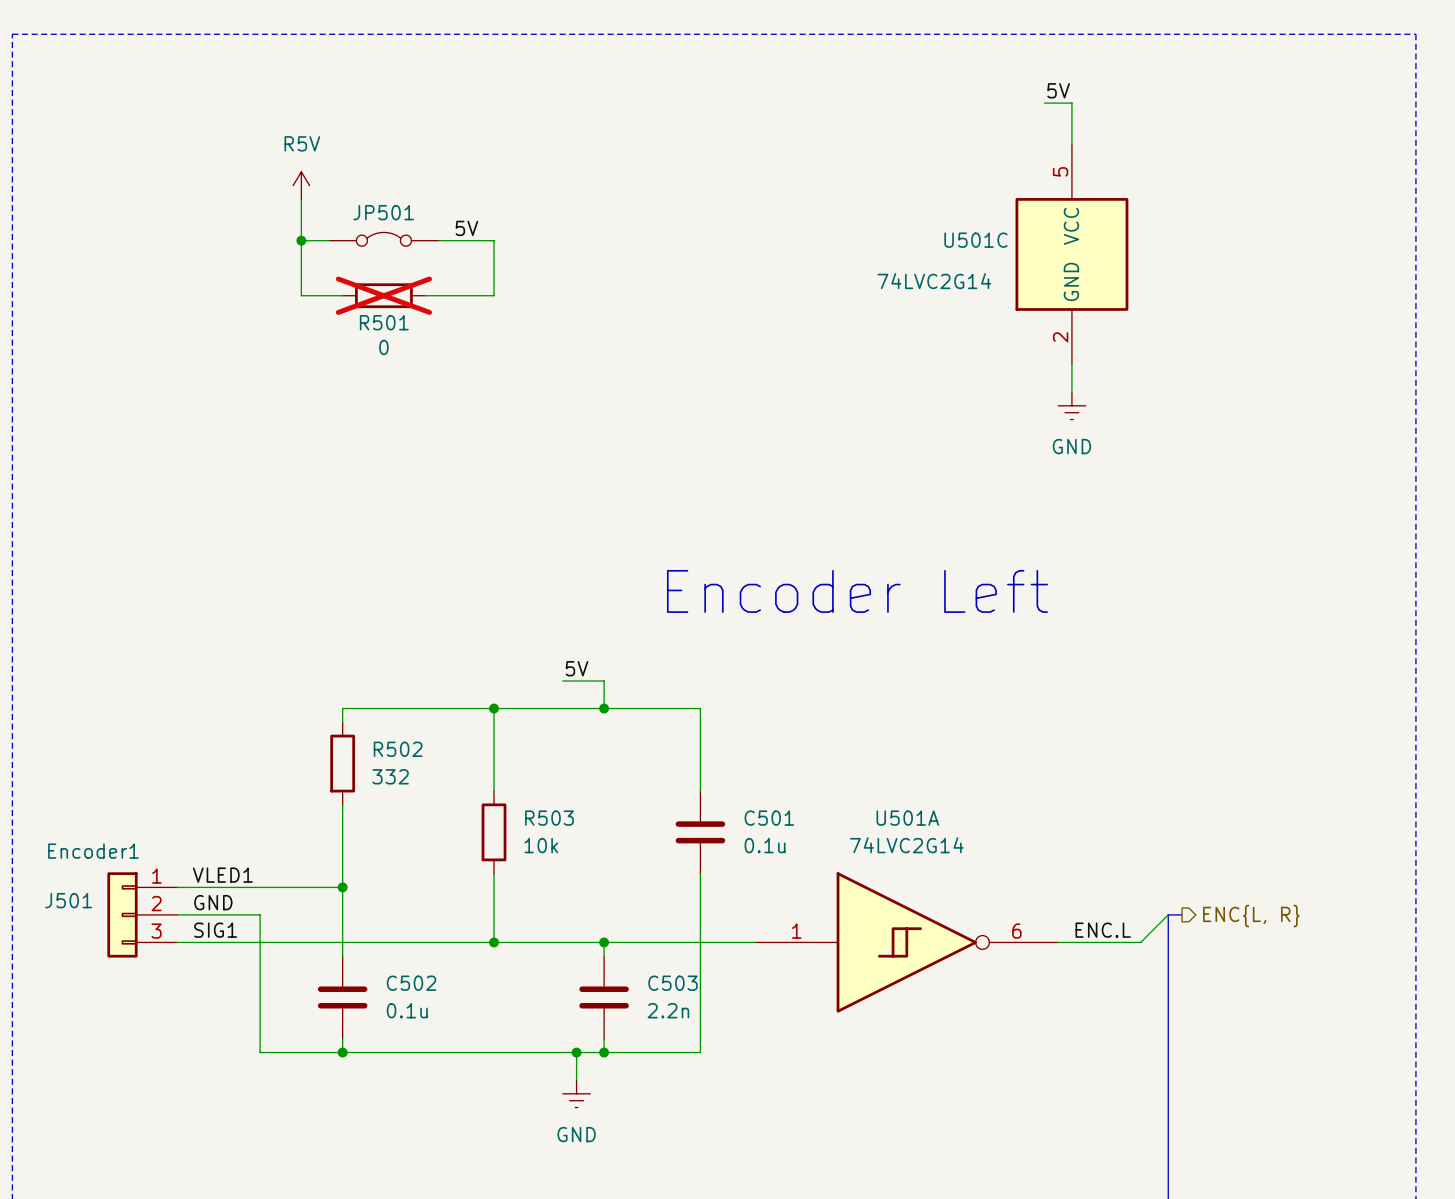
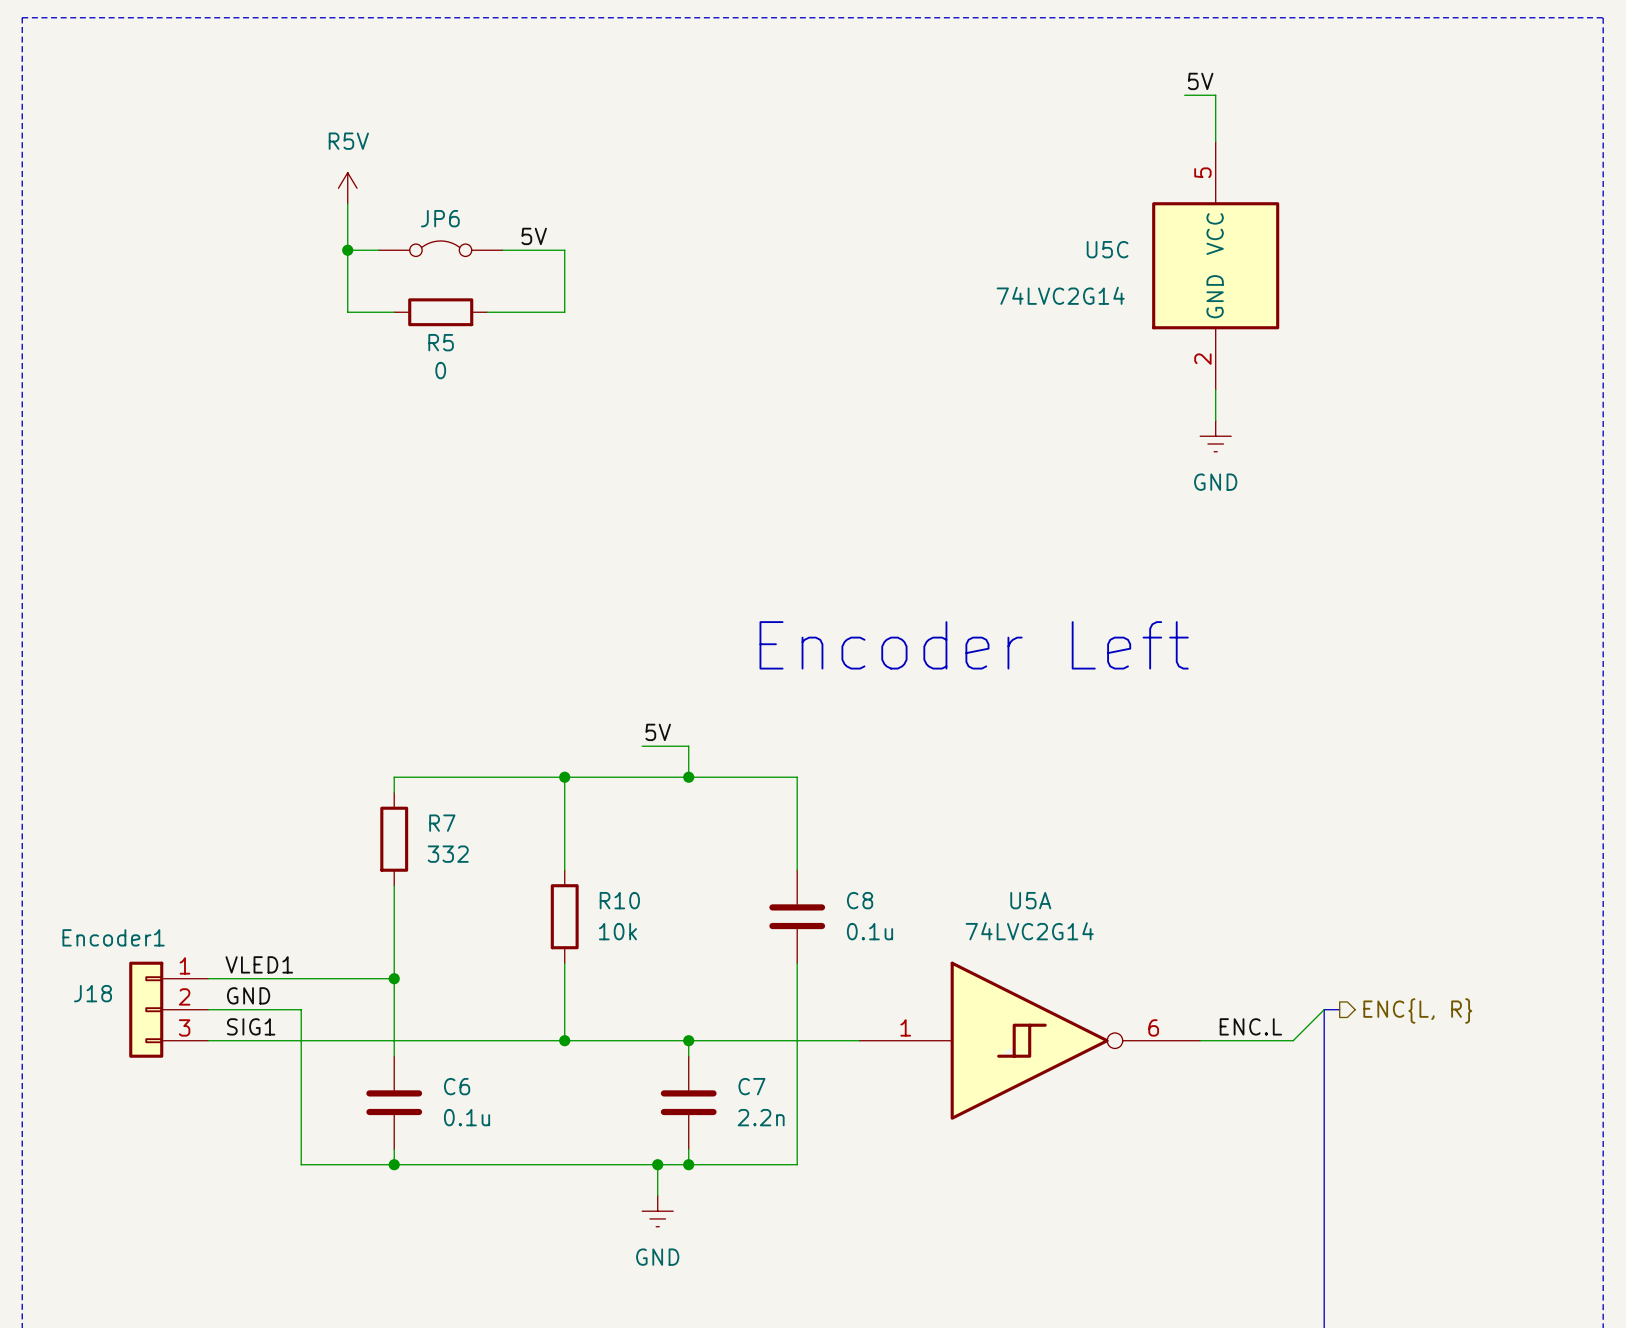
JP501 name: JP501 (383, 212) -> JP6 (440, 218)
U501C name: U501C (975, 240) -> U5C (1107, 249)
R501 do-not-place cross: (383, 295) -> none
R501 name: R501 (384, 322) -> R5 (441, 342)
R502 name: R502 (398, 749) -> R7 (442, 823)
R503 name: R503 (549, 818) -> R10 (619, 900)
C501 name: C501 (769, 818) -> C8 (860, 900)
U501A name: U501A (907, 818) -> U5A (1030, 900)
J501 name: J501 (68, 900) -> J18 (92, 993)
C502 name: C502 (411, 983) -> C6 (457, 1086)
C503 name: C503 (673, 983) -> C7 (751, 1086)

